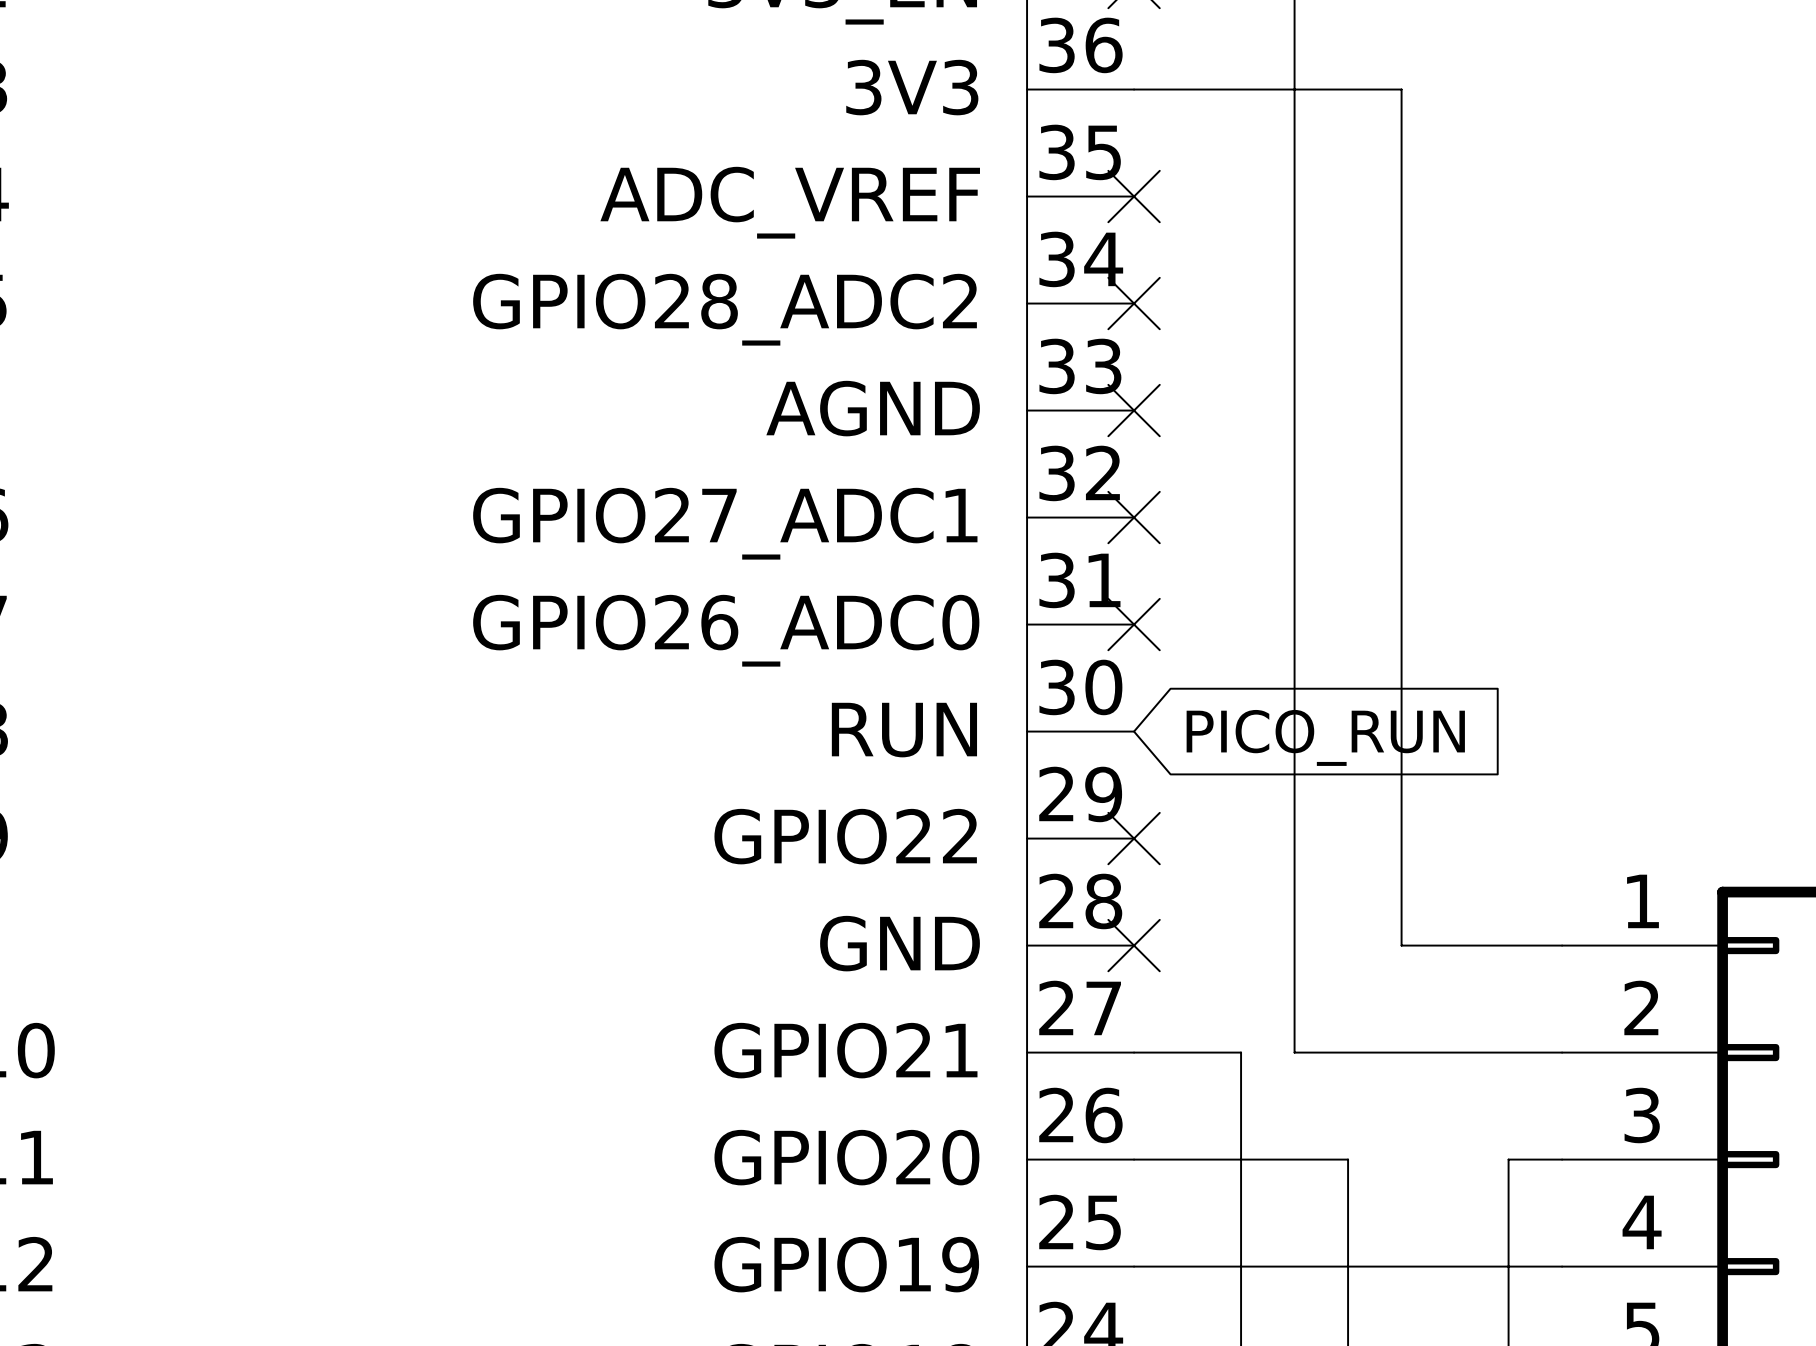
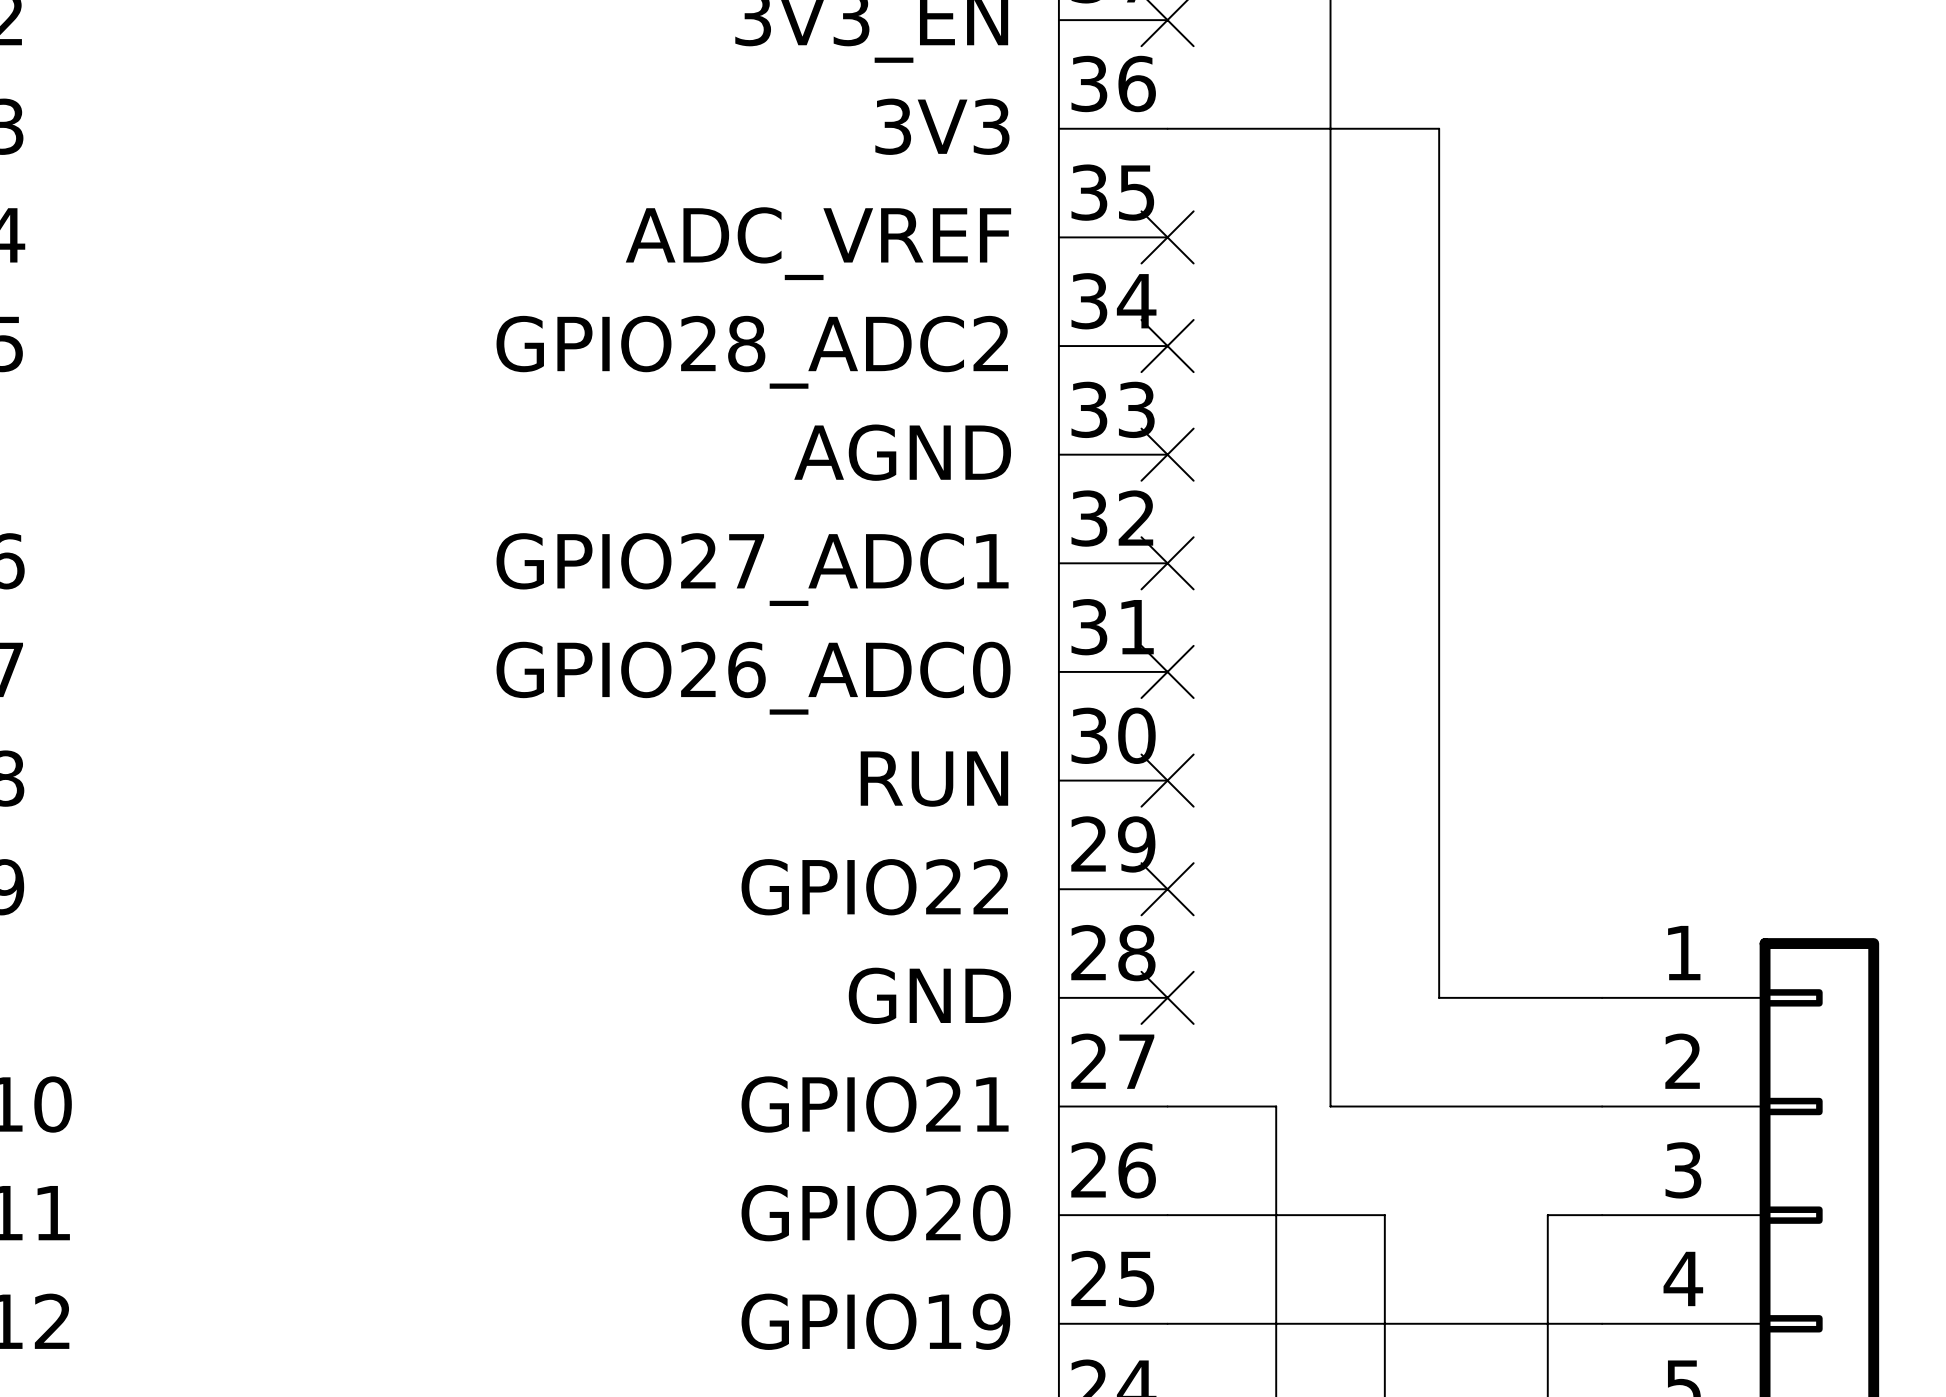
no-connect mark: none -> (1167, 780)
global label: PICO_RUN (1325, 737) -> none

